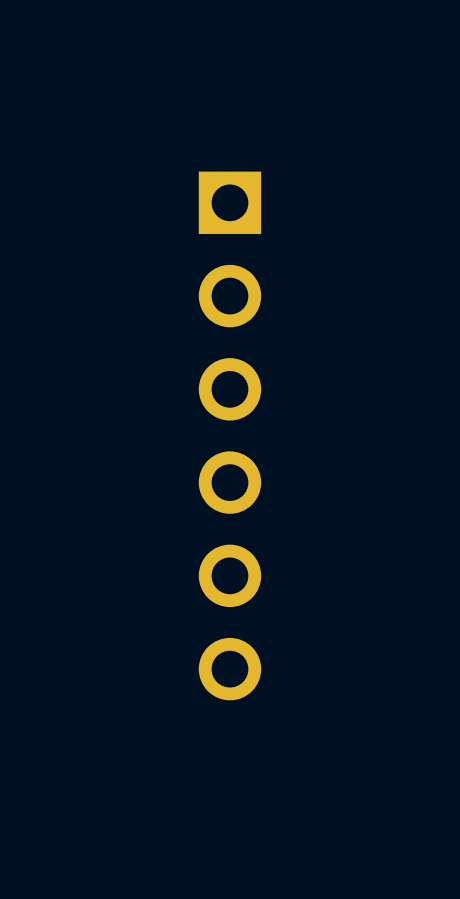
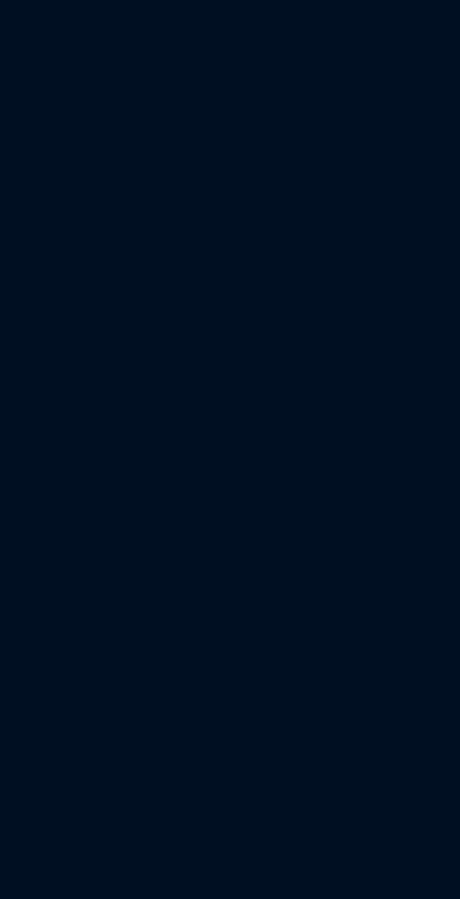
part: (229, 435) -> none

